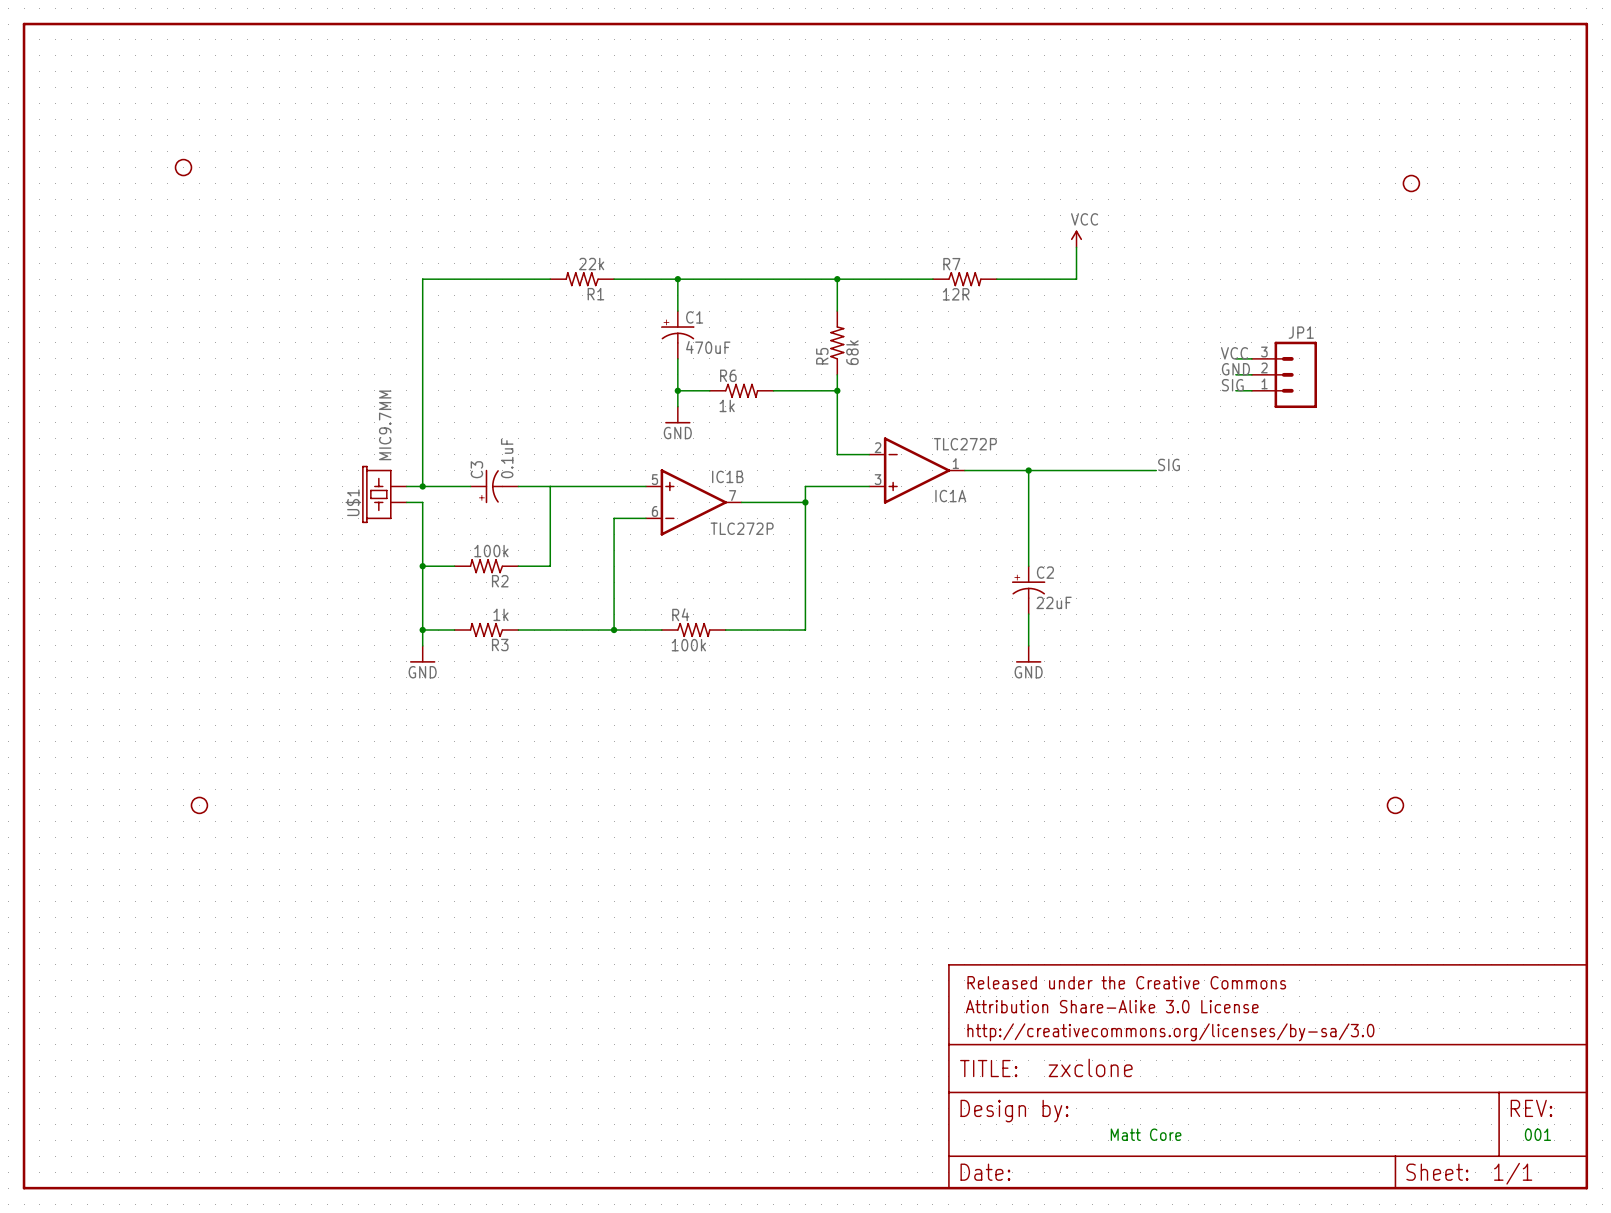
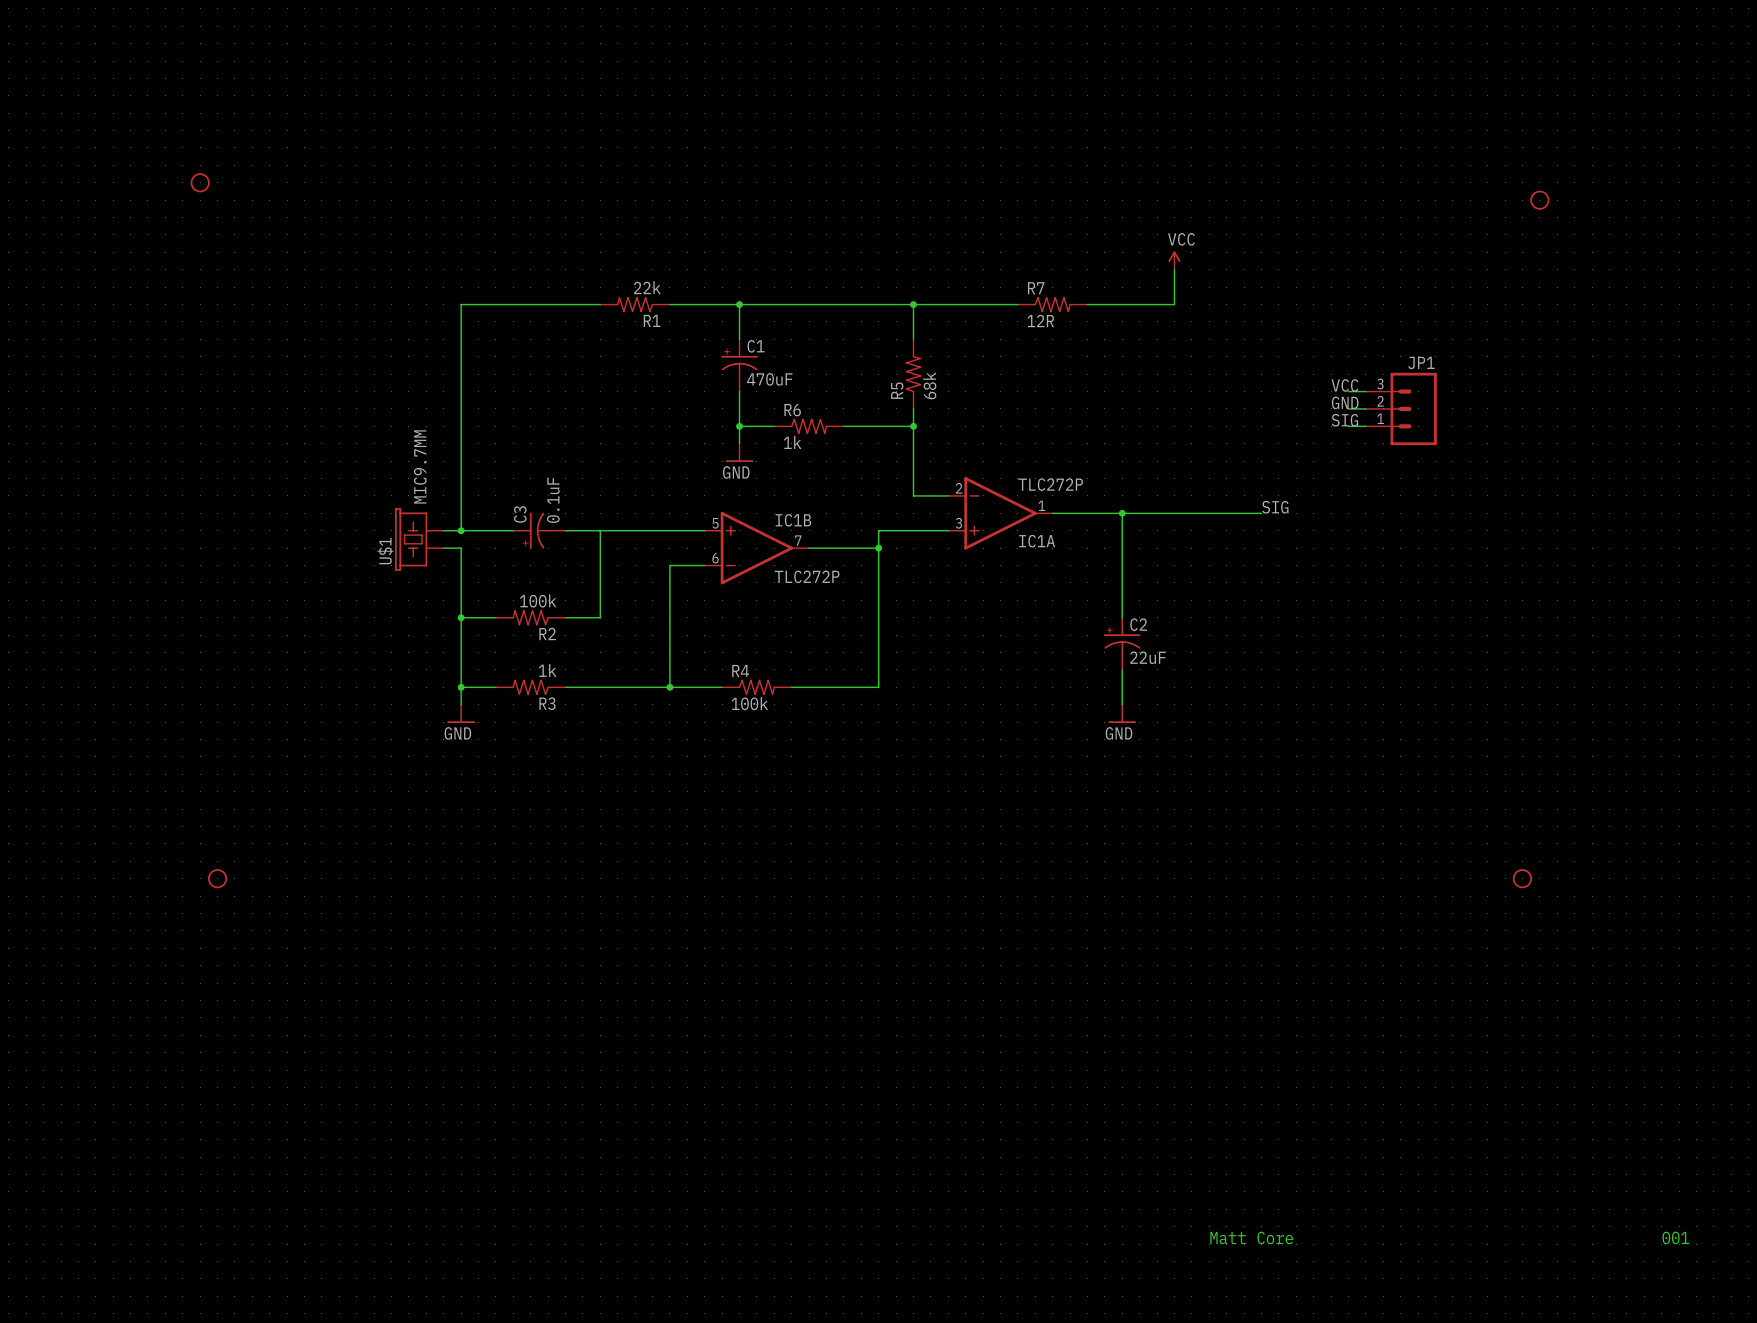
part: (805, 606) -> none
part: (1267, 1076) -> none

